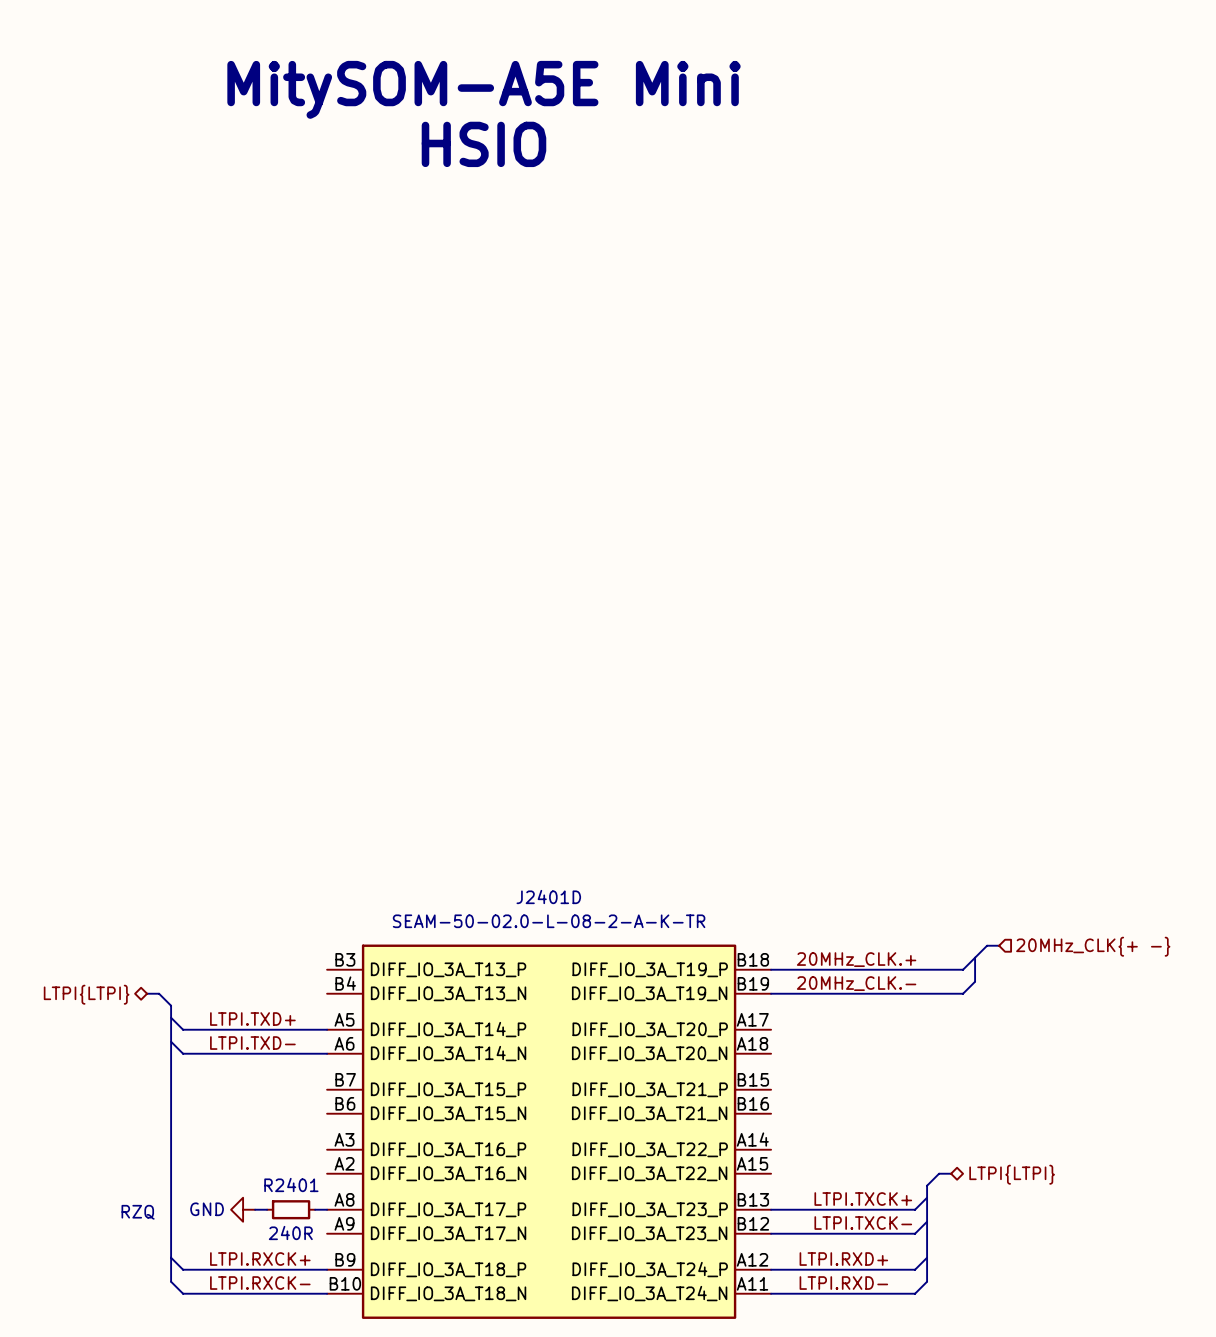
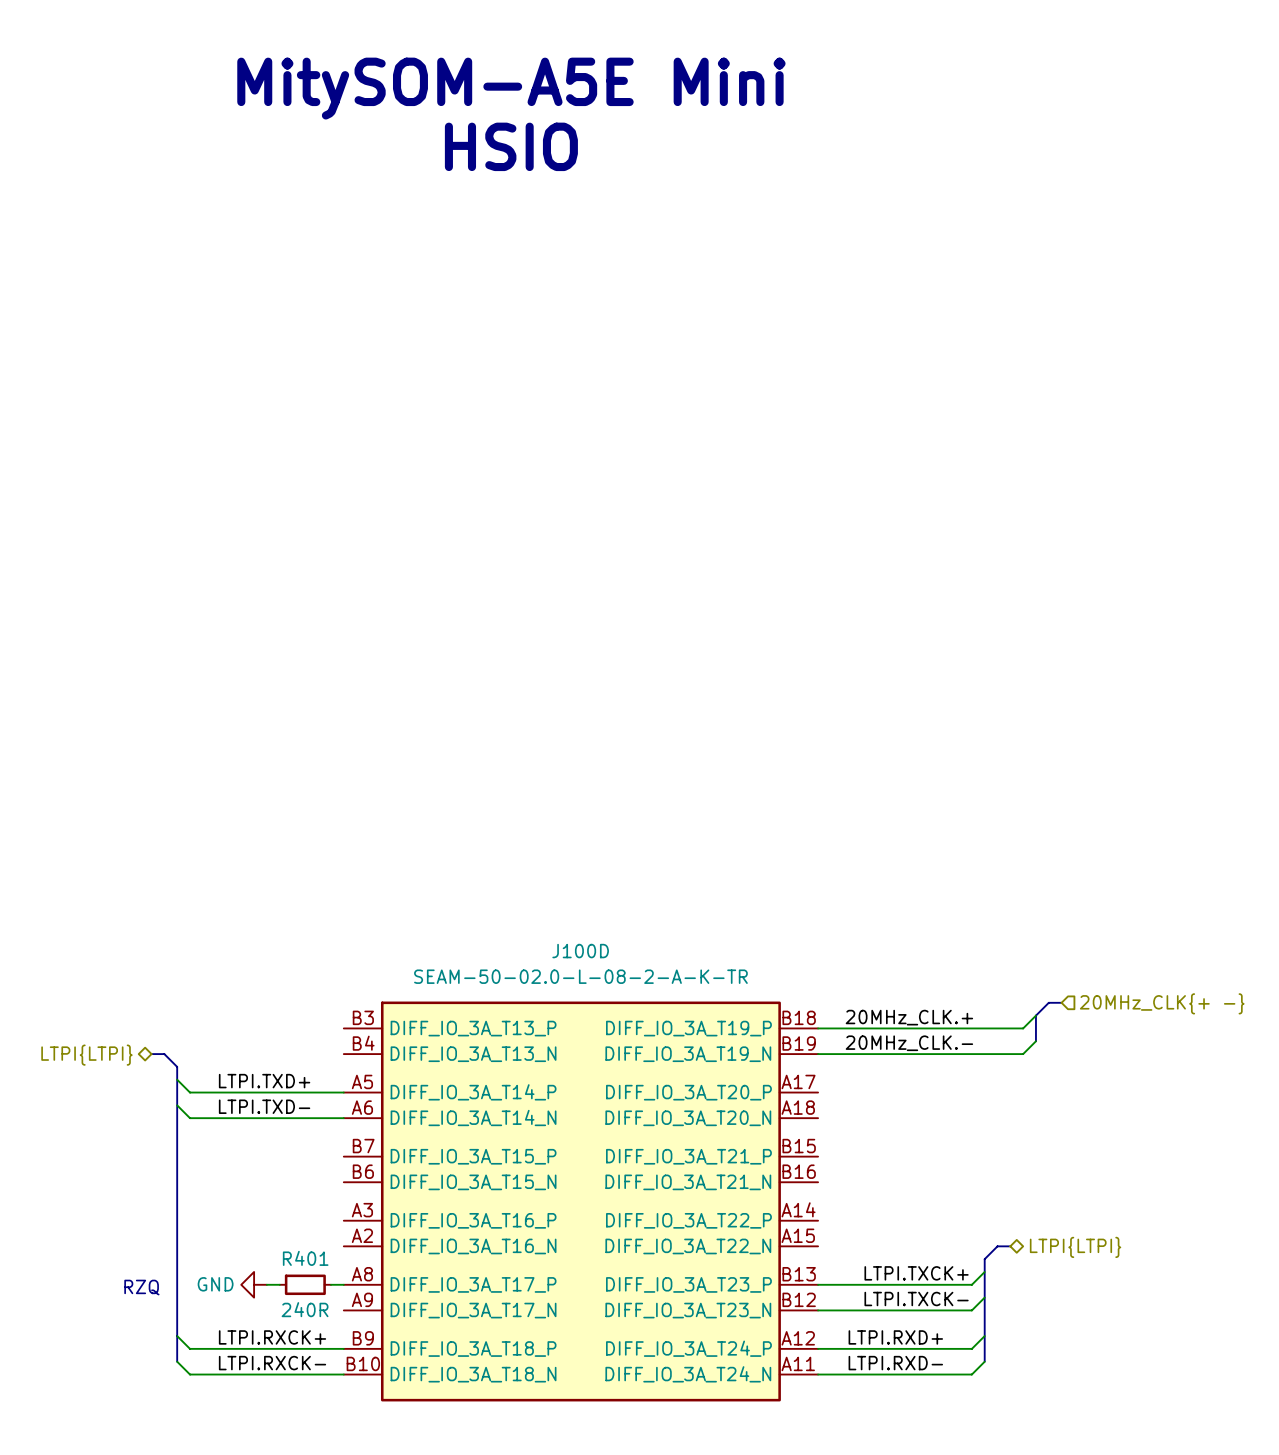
J2401D name: J2401D (548, 897) -> J100D (580, 951)
R2401 name: R2401 (291, 1185) -> R401 (305, 1258)

